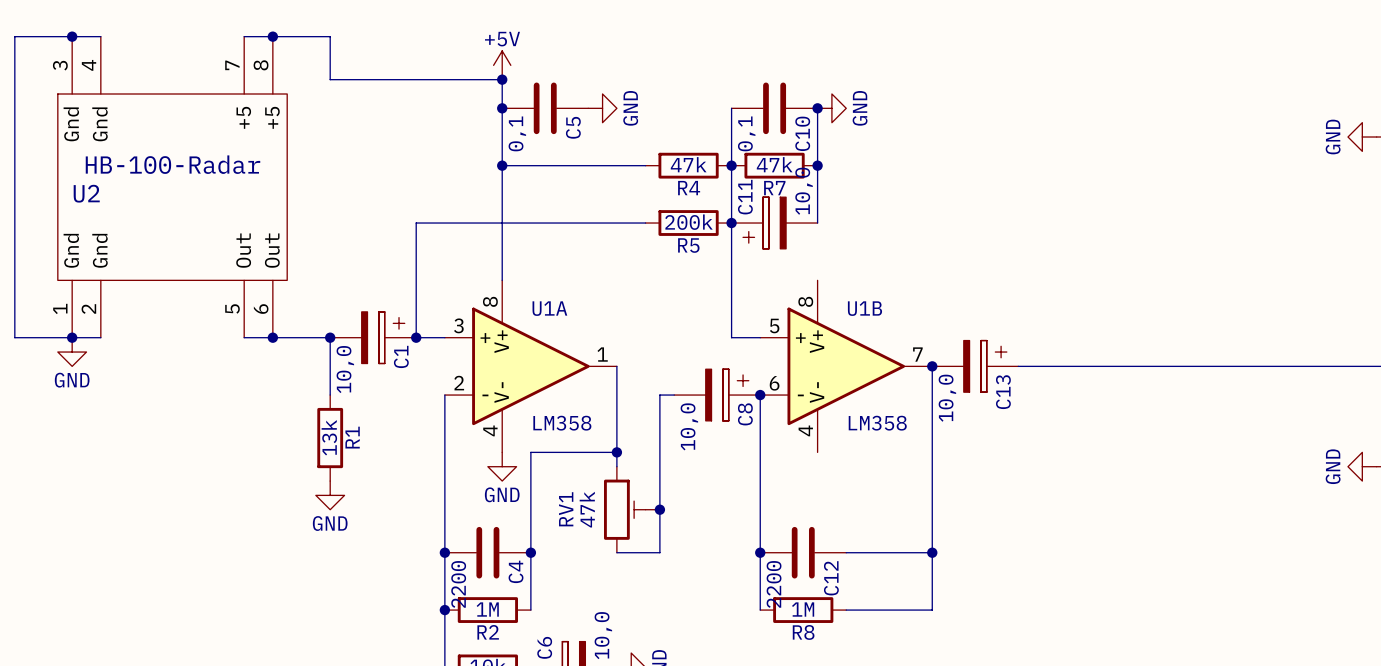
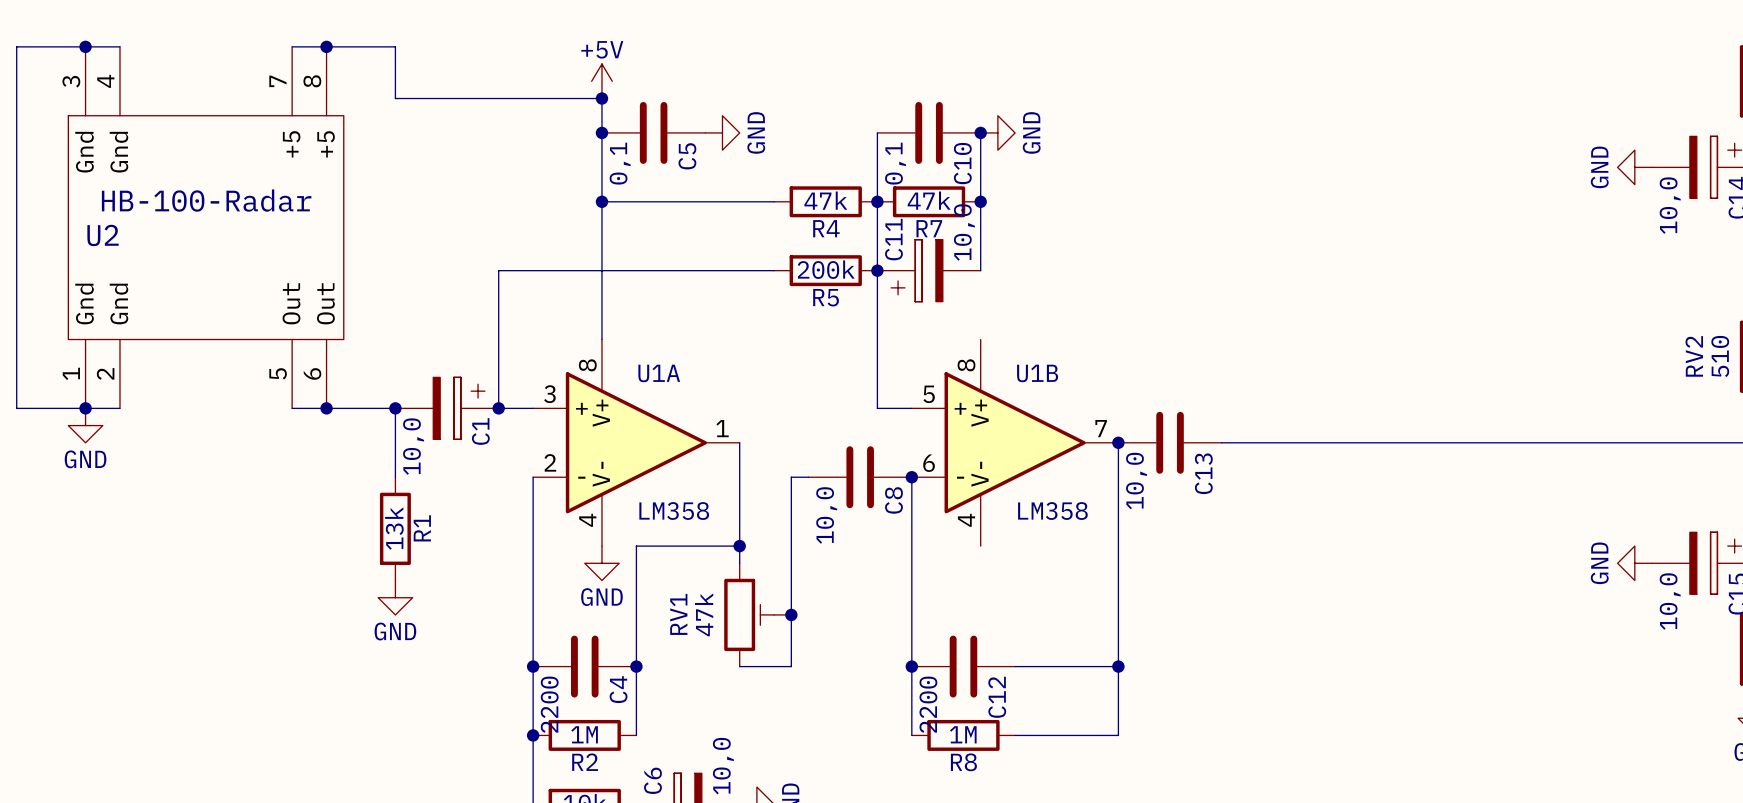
C13 symbol: [932, 340, 1019, 393] -> [1118, 411, 1222, 474]
C8 symbol: [674, 369, 761, 421] -> [808, 446, 912, 509]

